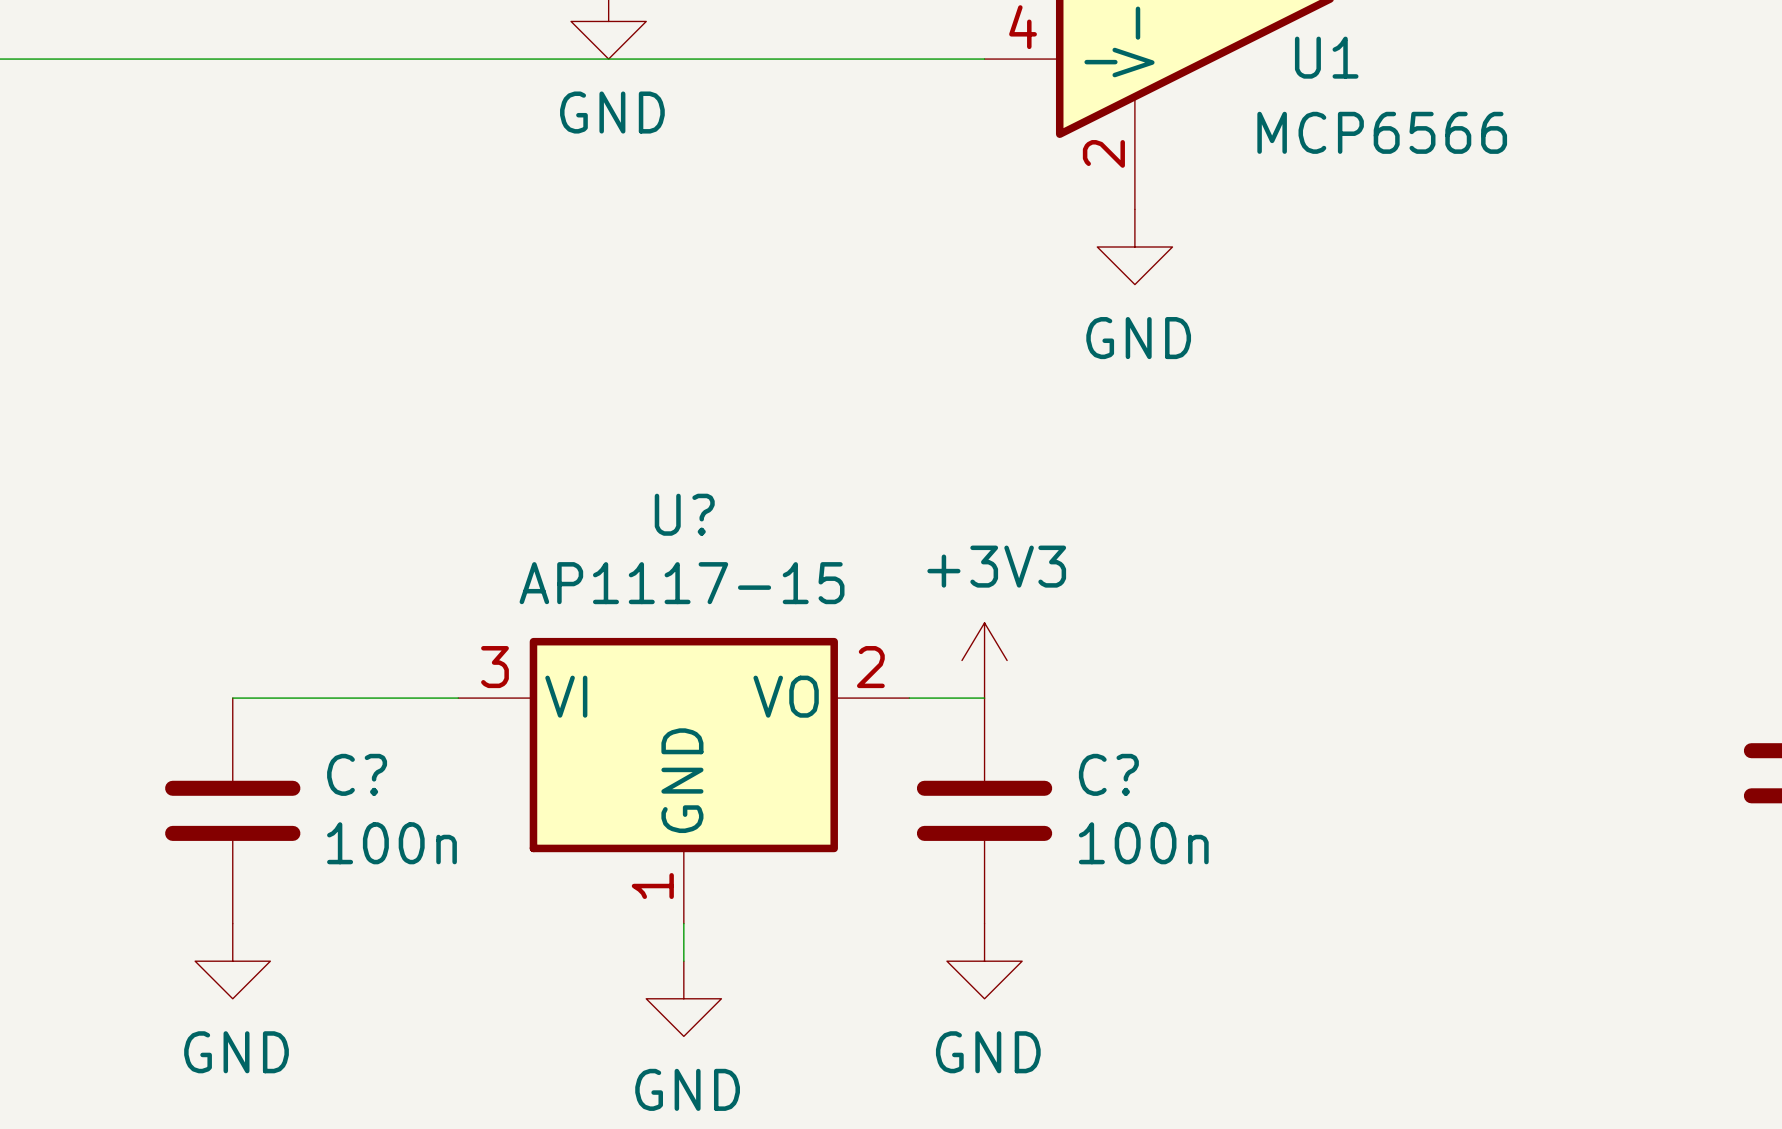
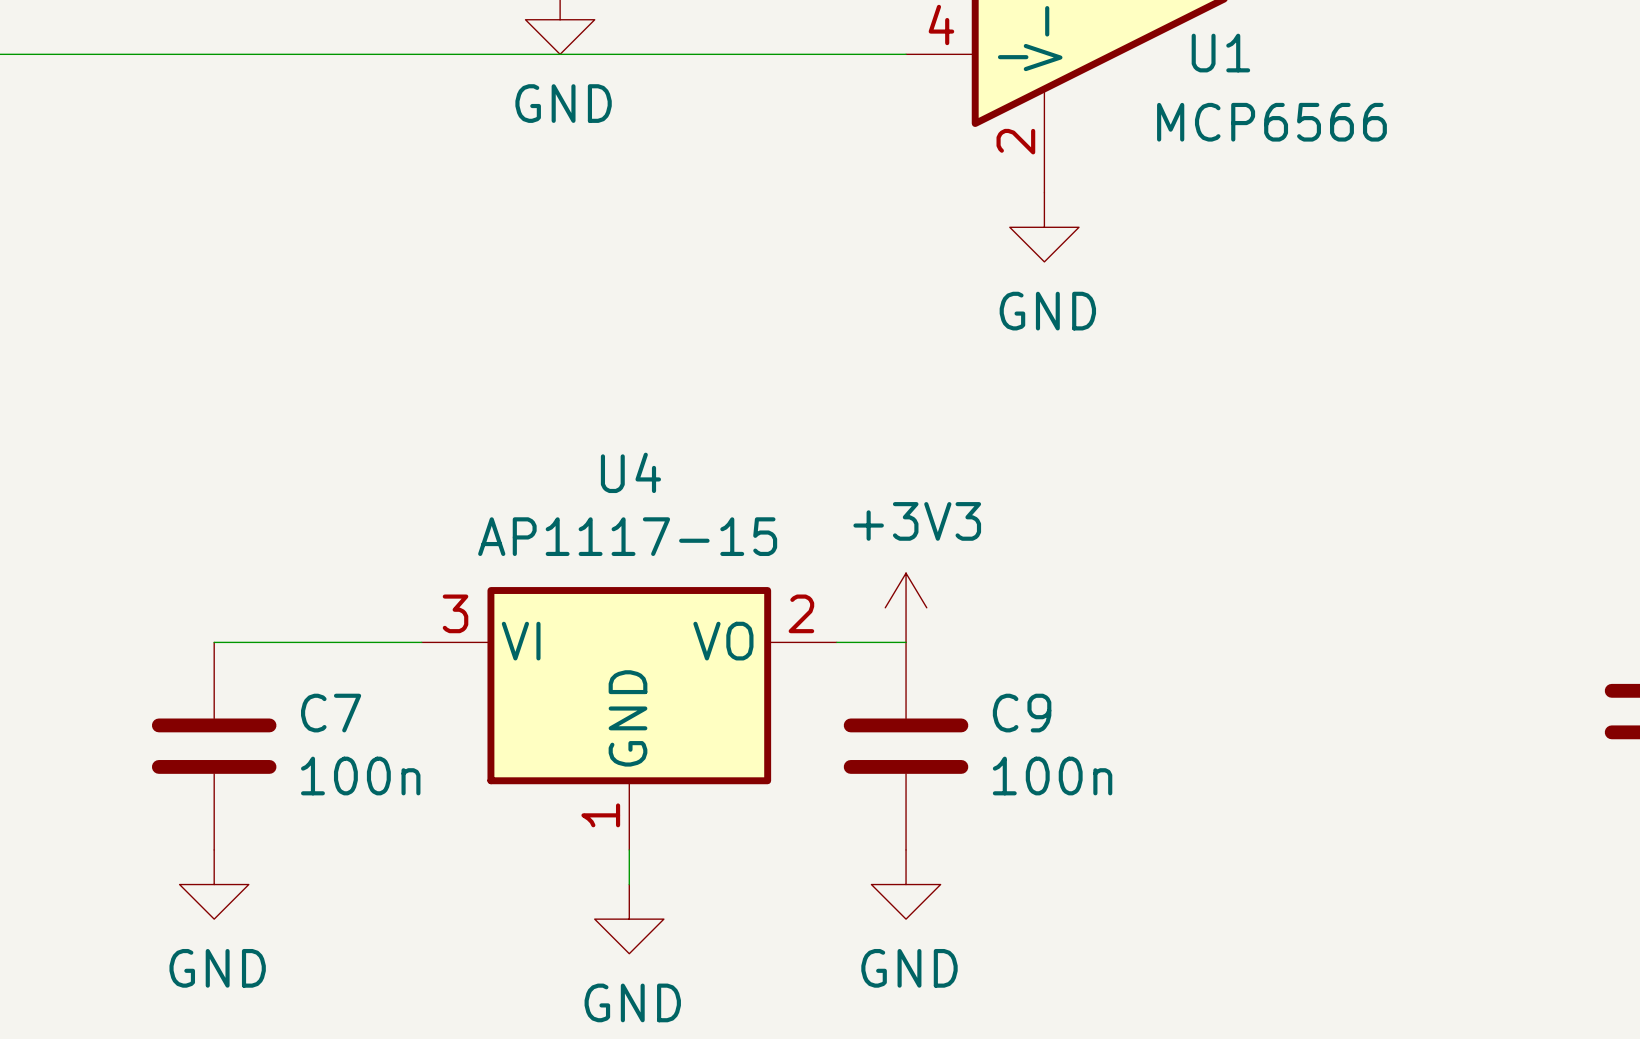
U? name: U? (684, 514) -> U4 (630, 472)
C? name: C? (357, 774) -> C7 (331, 713)
C? name: C? (1108, 774) -> C9 (1022, 713)

